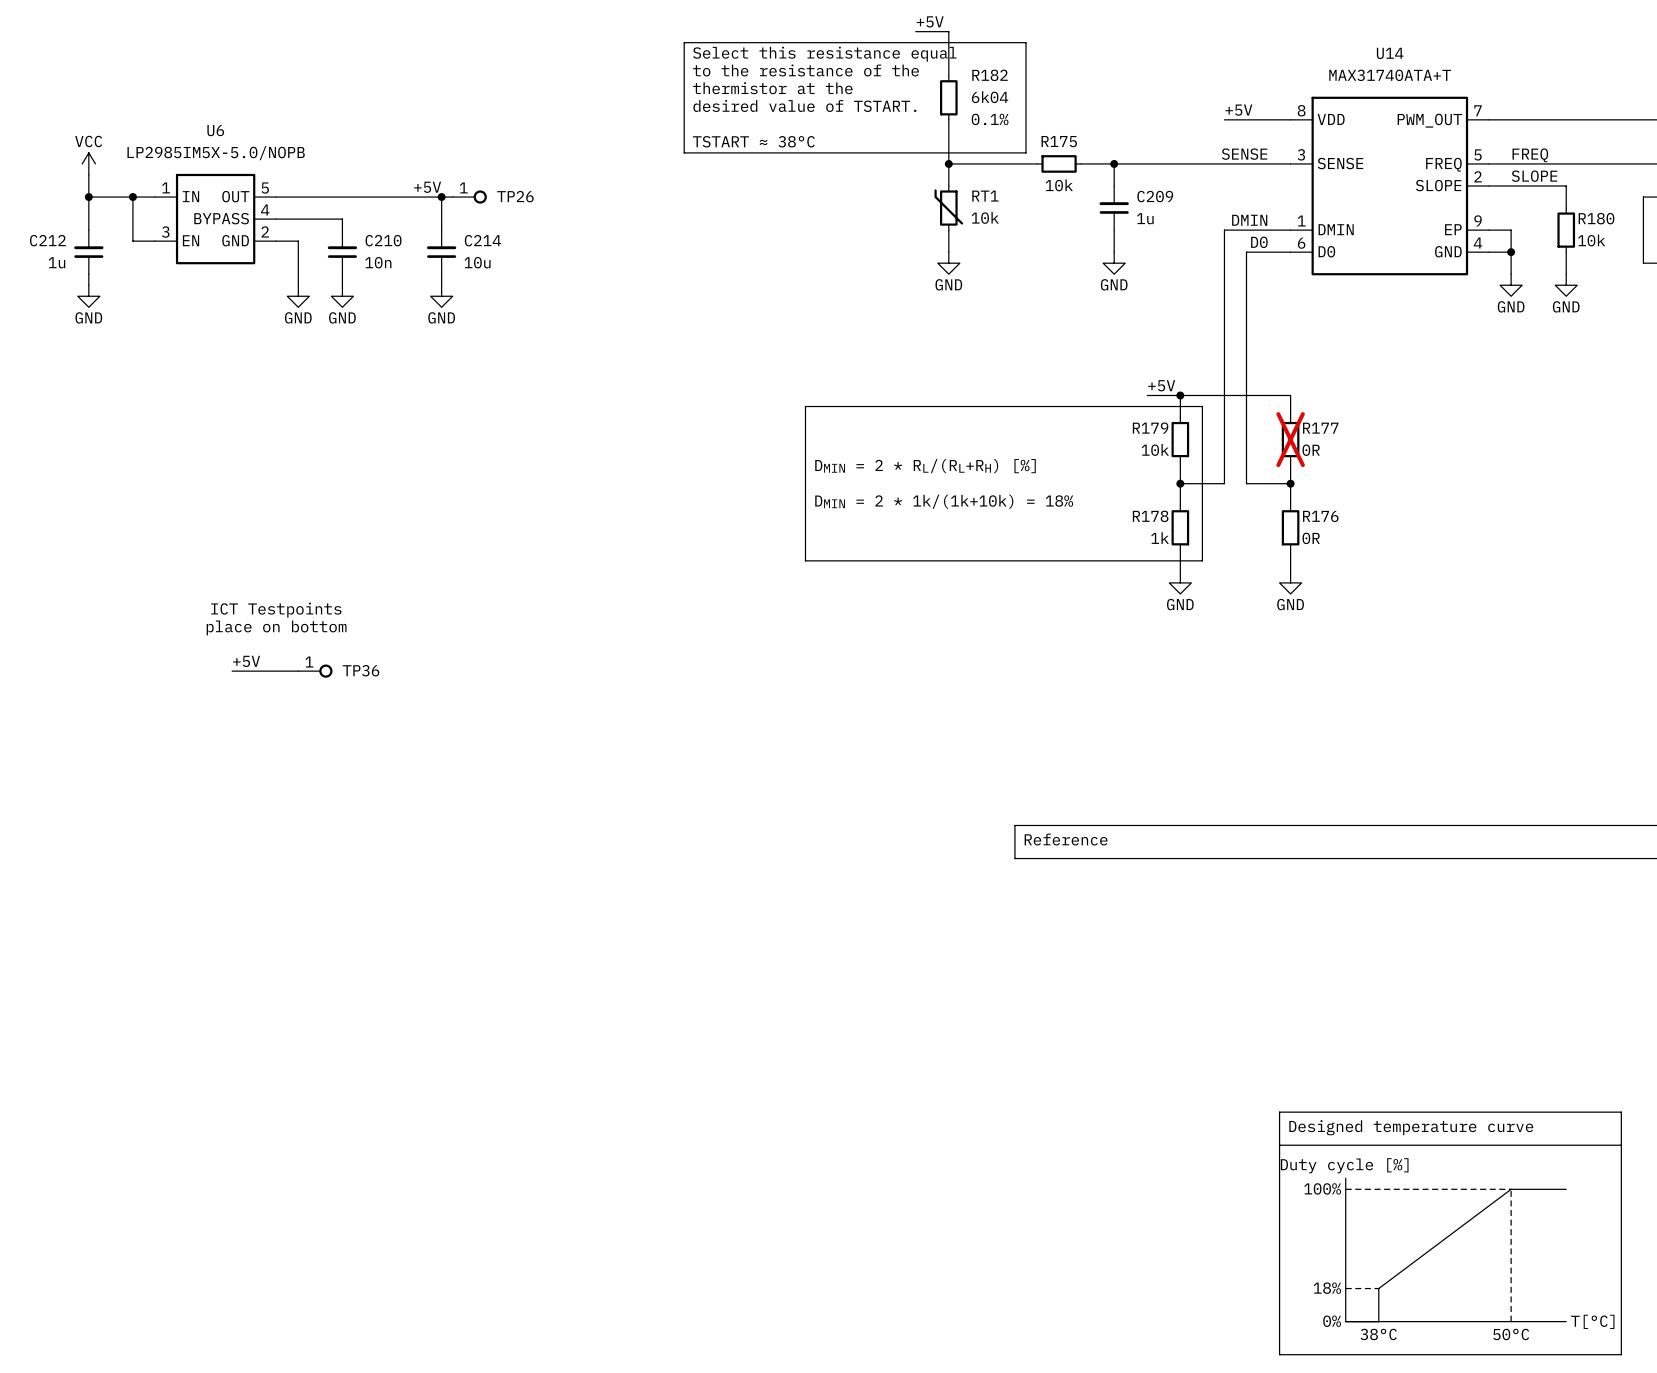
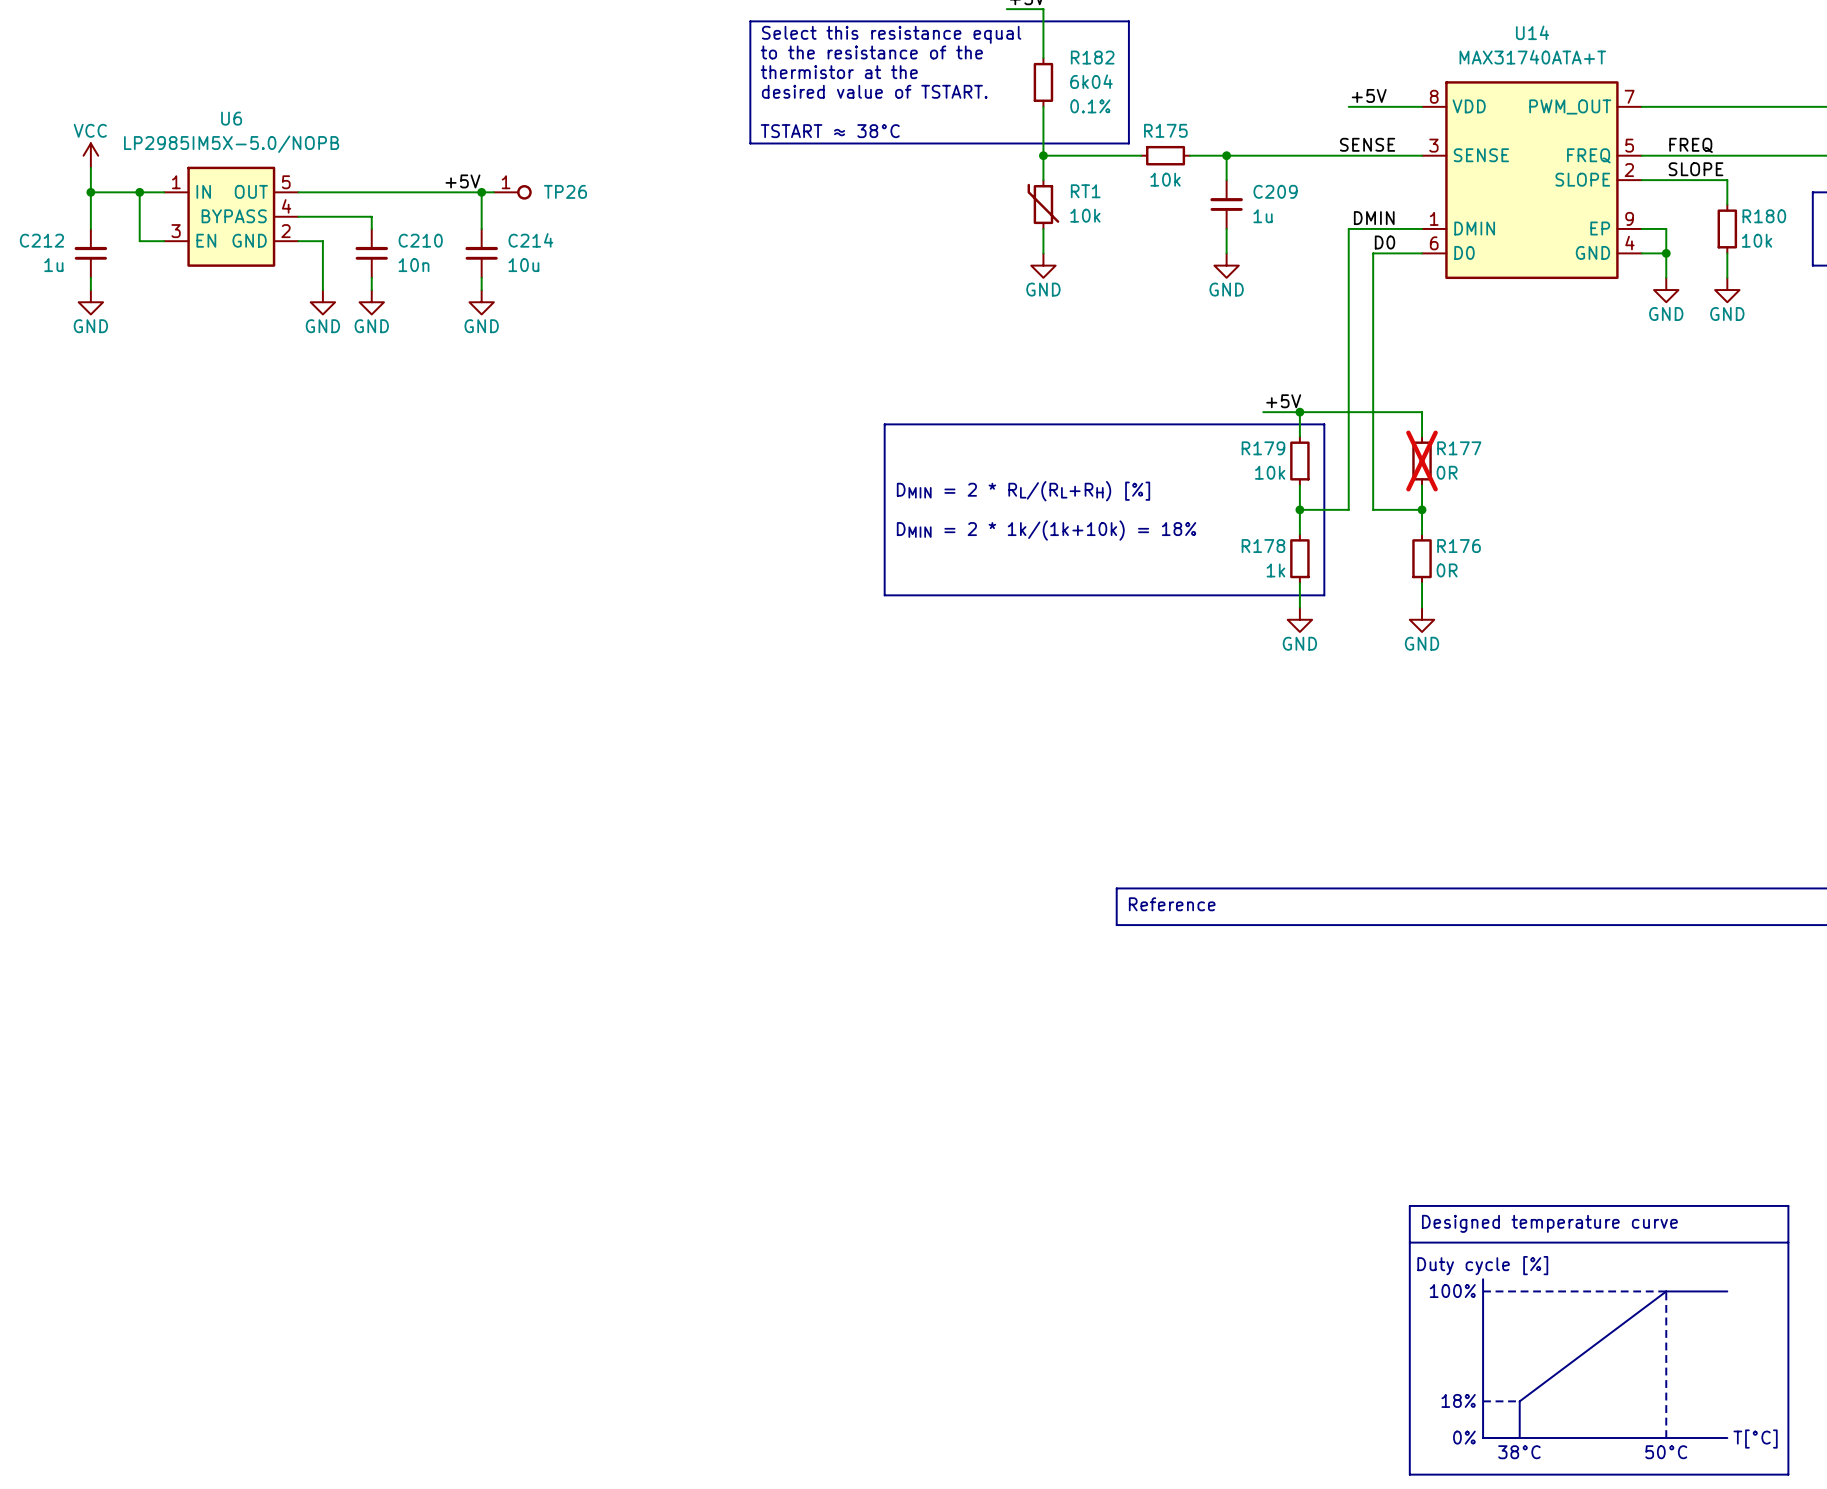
text: ICT Testpoints (276, 610) -> none
text: place on bottom (276, 627) -> none
label: +5V (246, 661) -> none
wire: (232, 671) (298, 671) -> none
TP36: (315, 671) -> none

